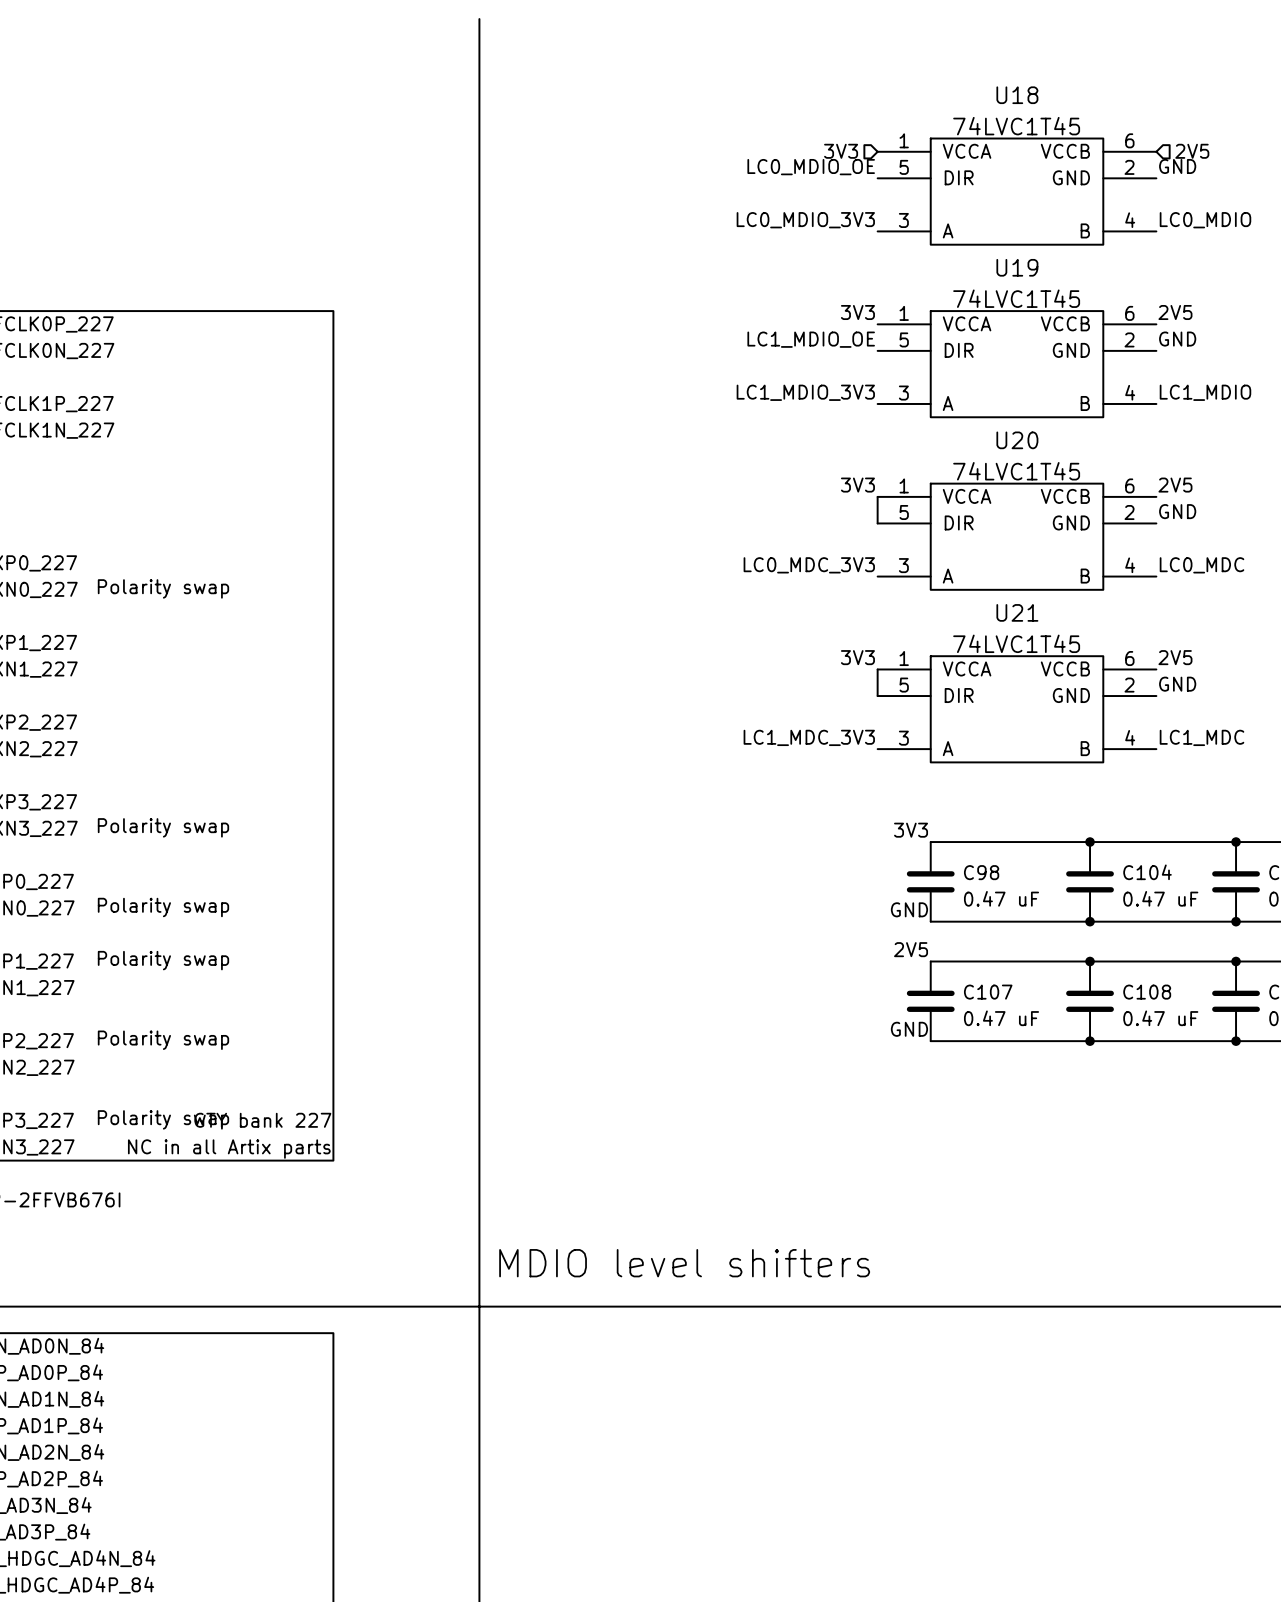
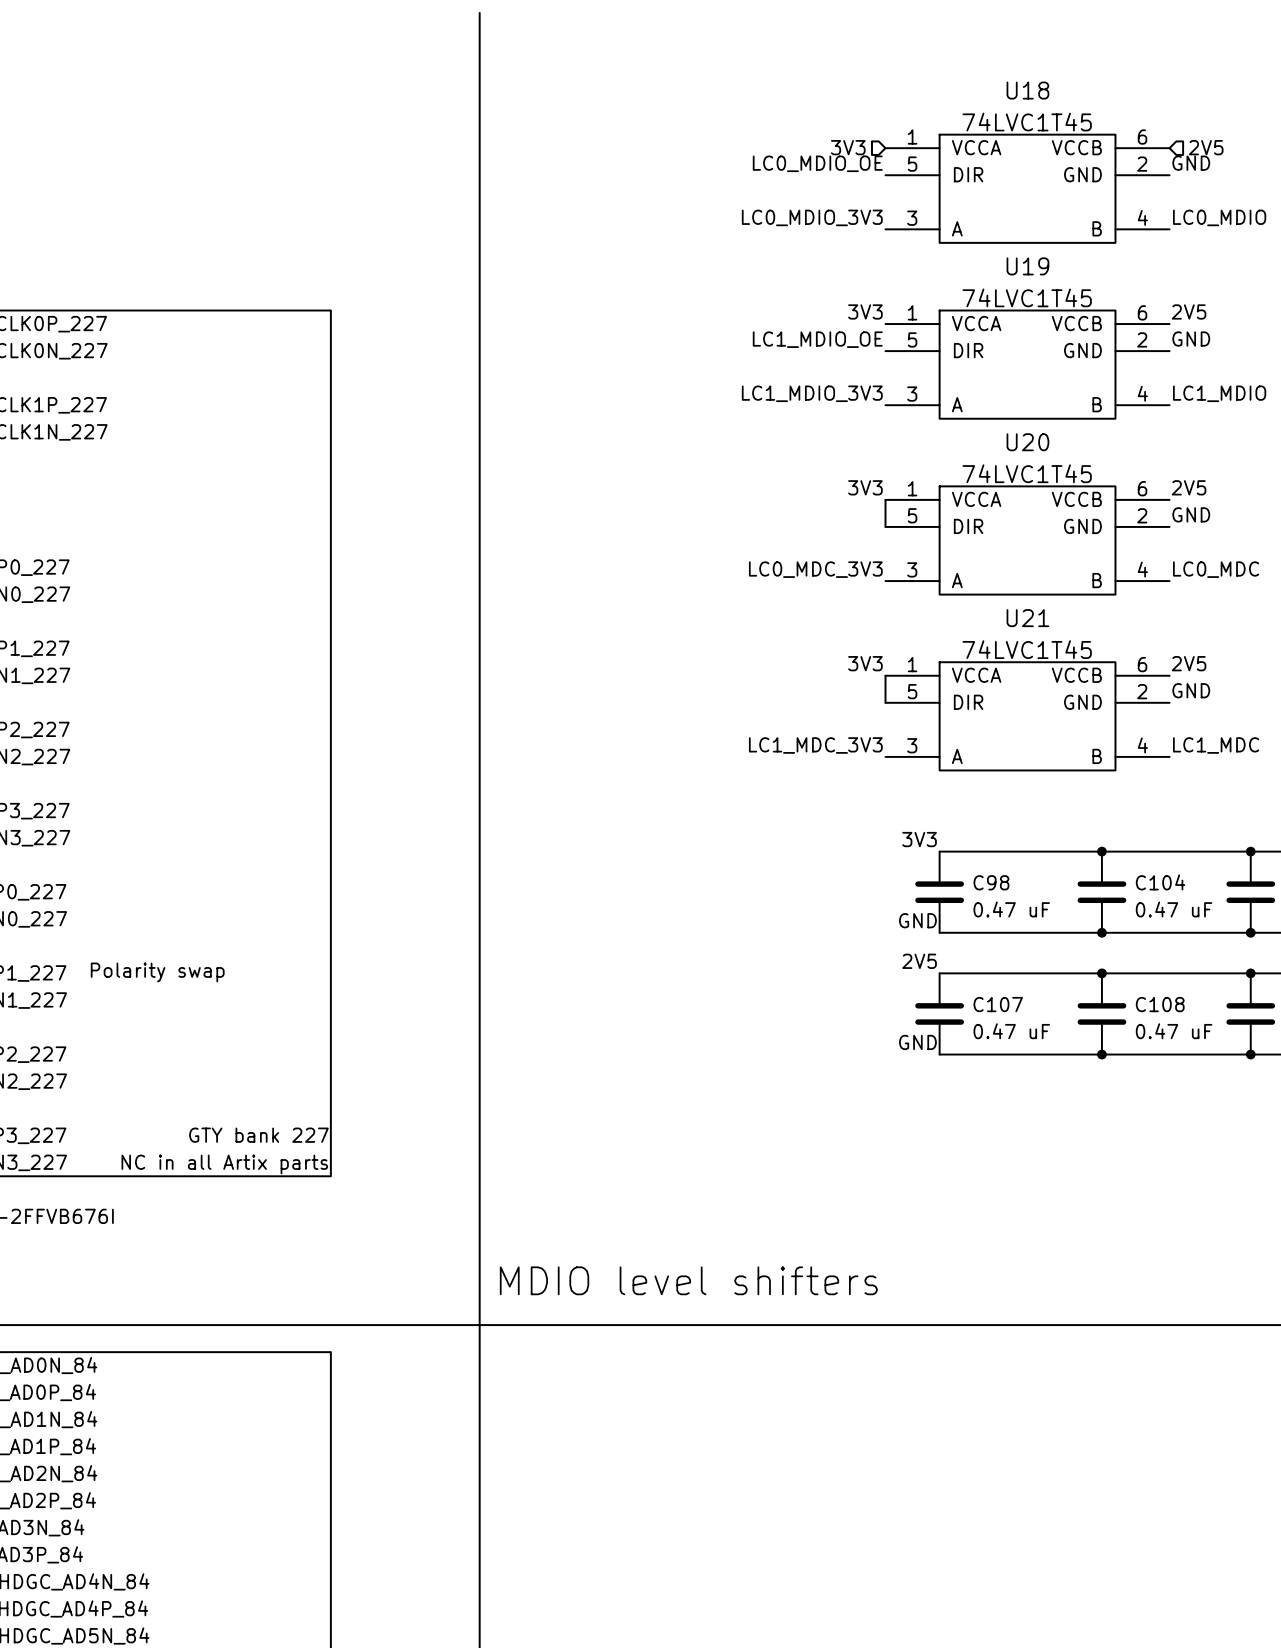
text: Polarity swap (163, 588) -> none
text: Polarity swap (163, 827) -> none
text: Polarity swap (163, 907) -> none
text: Polarity swap (163, 1040) -> none
text: Polarity swap (163, 1119) -> none

